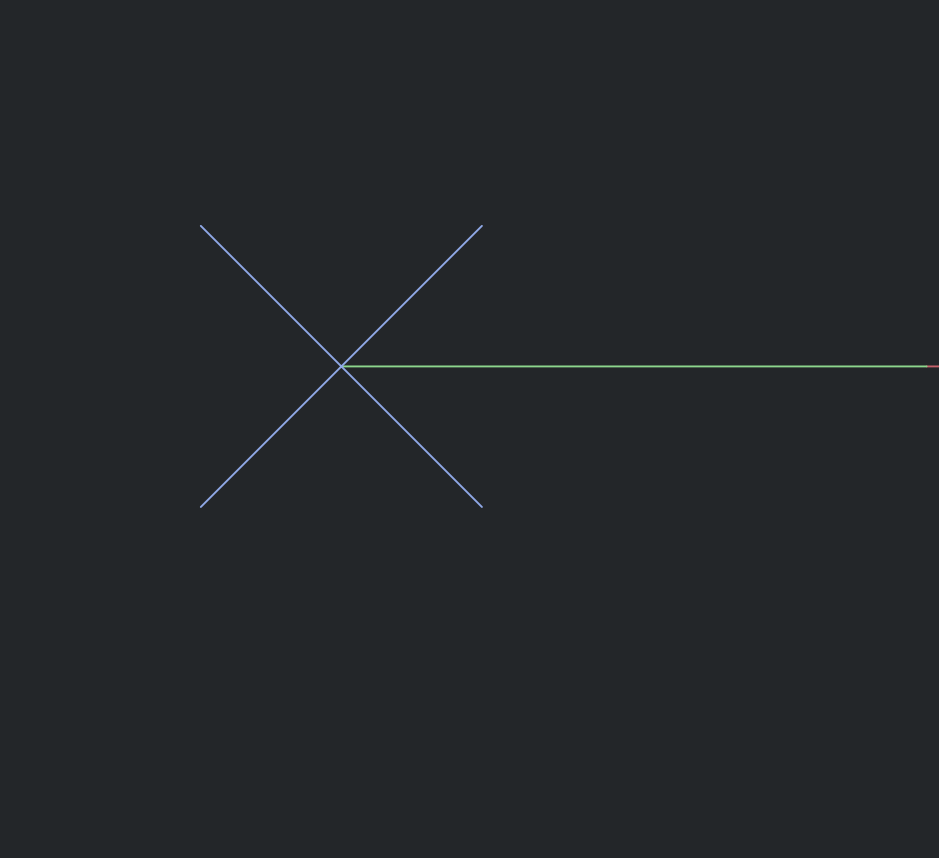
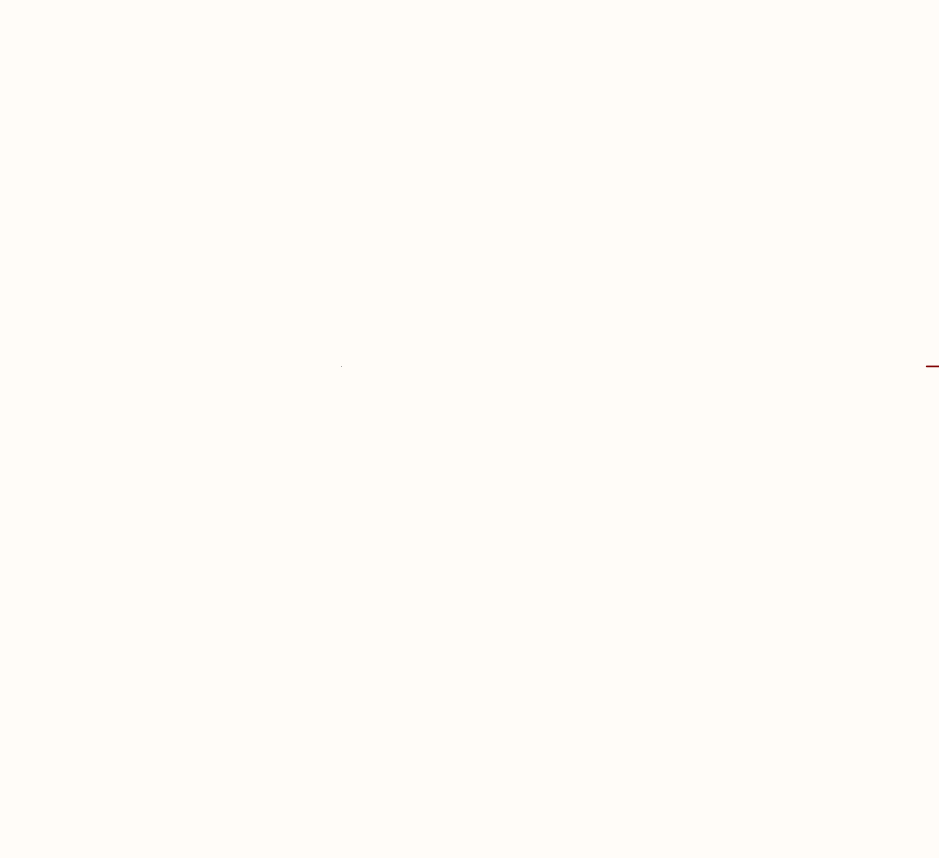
wire: (341, 366) (926, 366) -> none
no-connect mark: (341, 366) -> none

